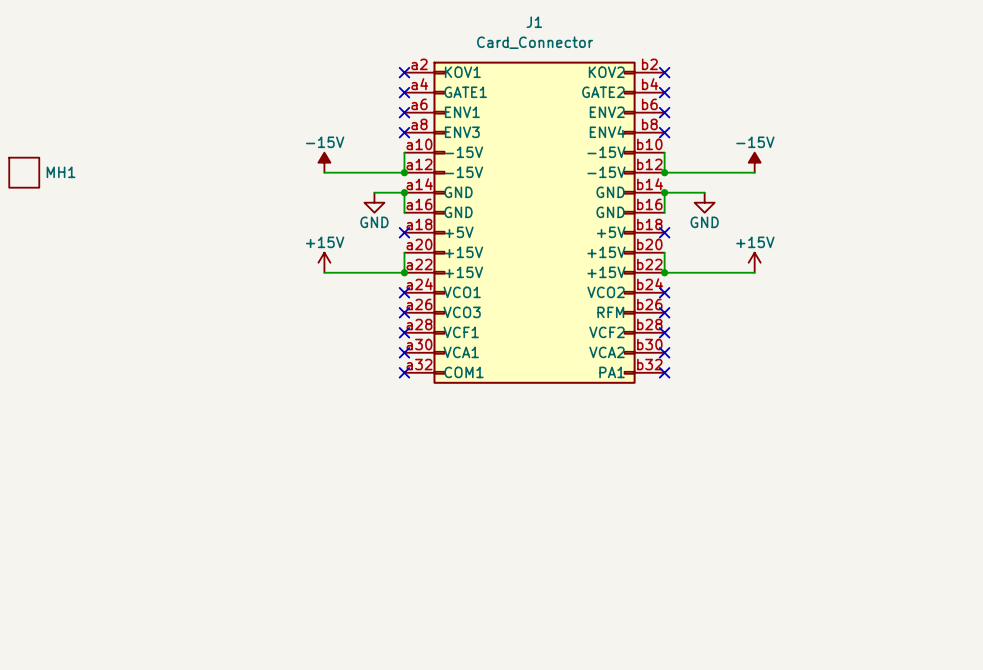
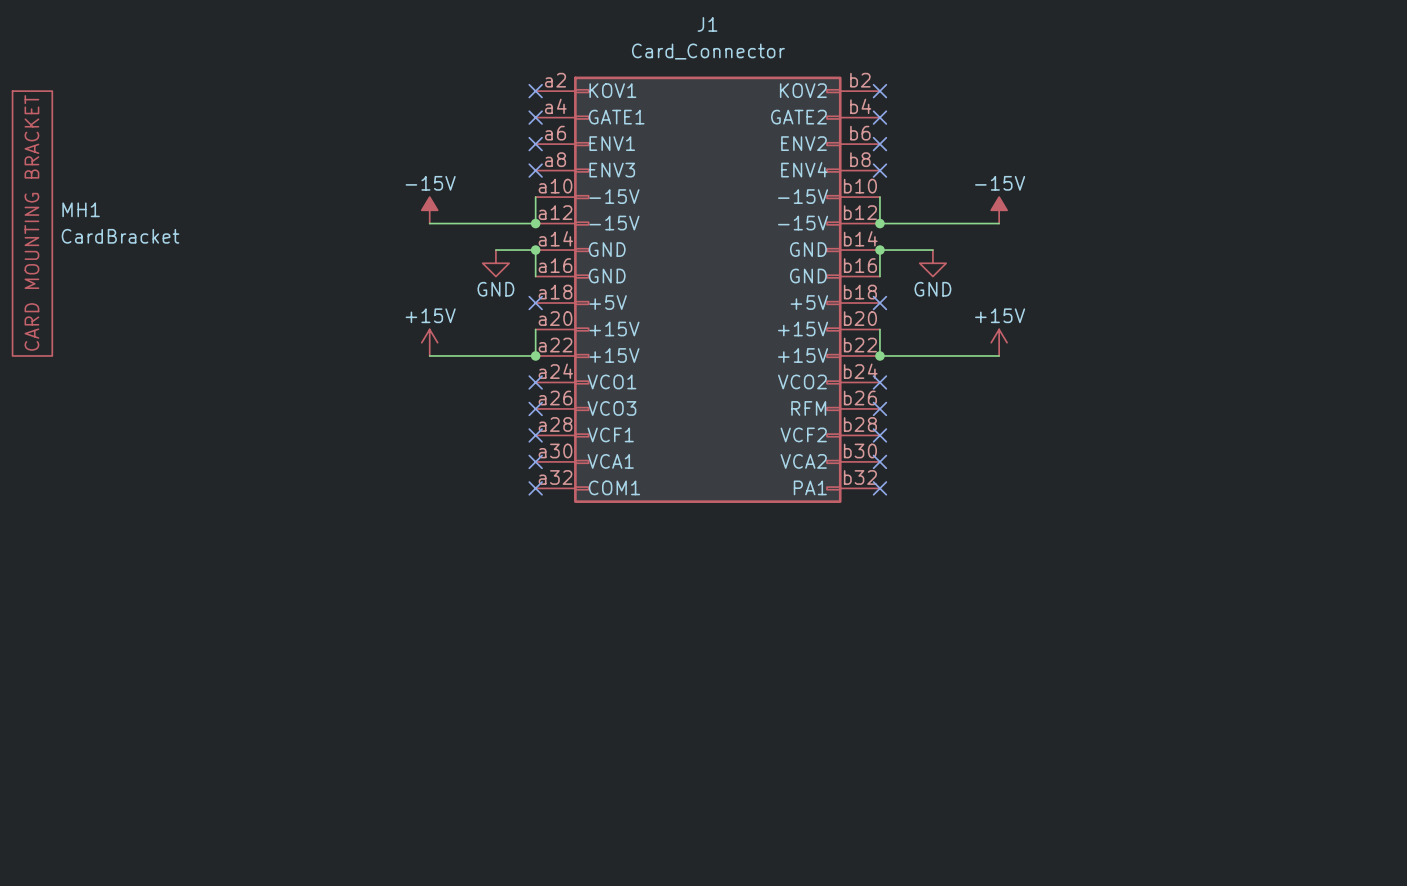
MH1 symbol: [9, 157, 40, 188] -> [12, 91, 53, 356]
MH1 value: none -> CardBracket (120, 236)

